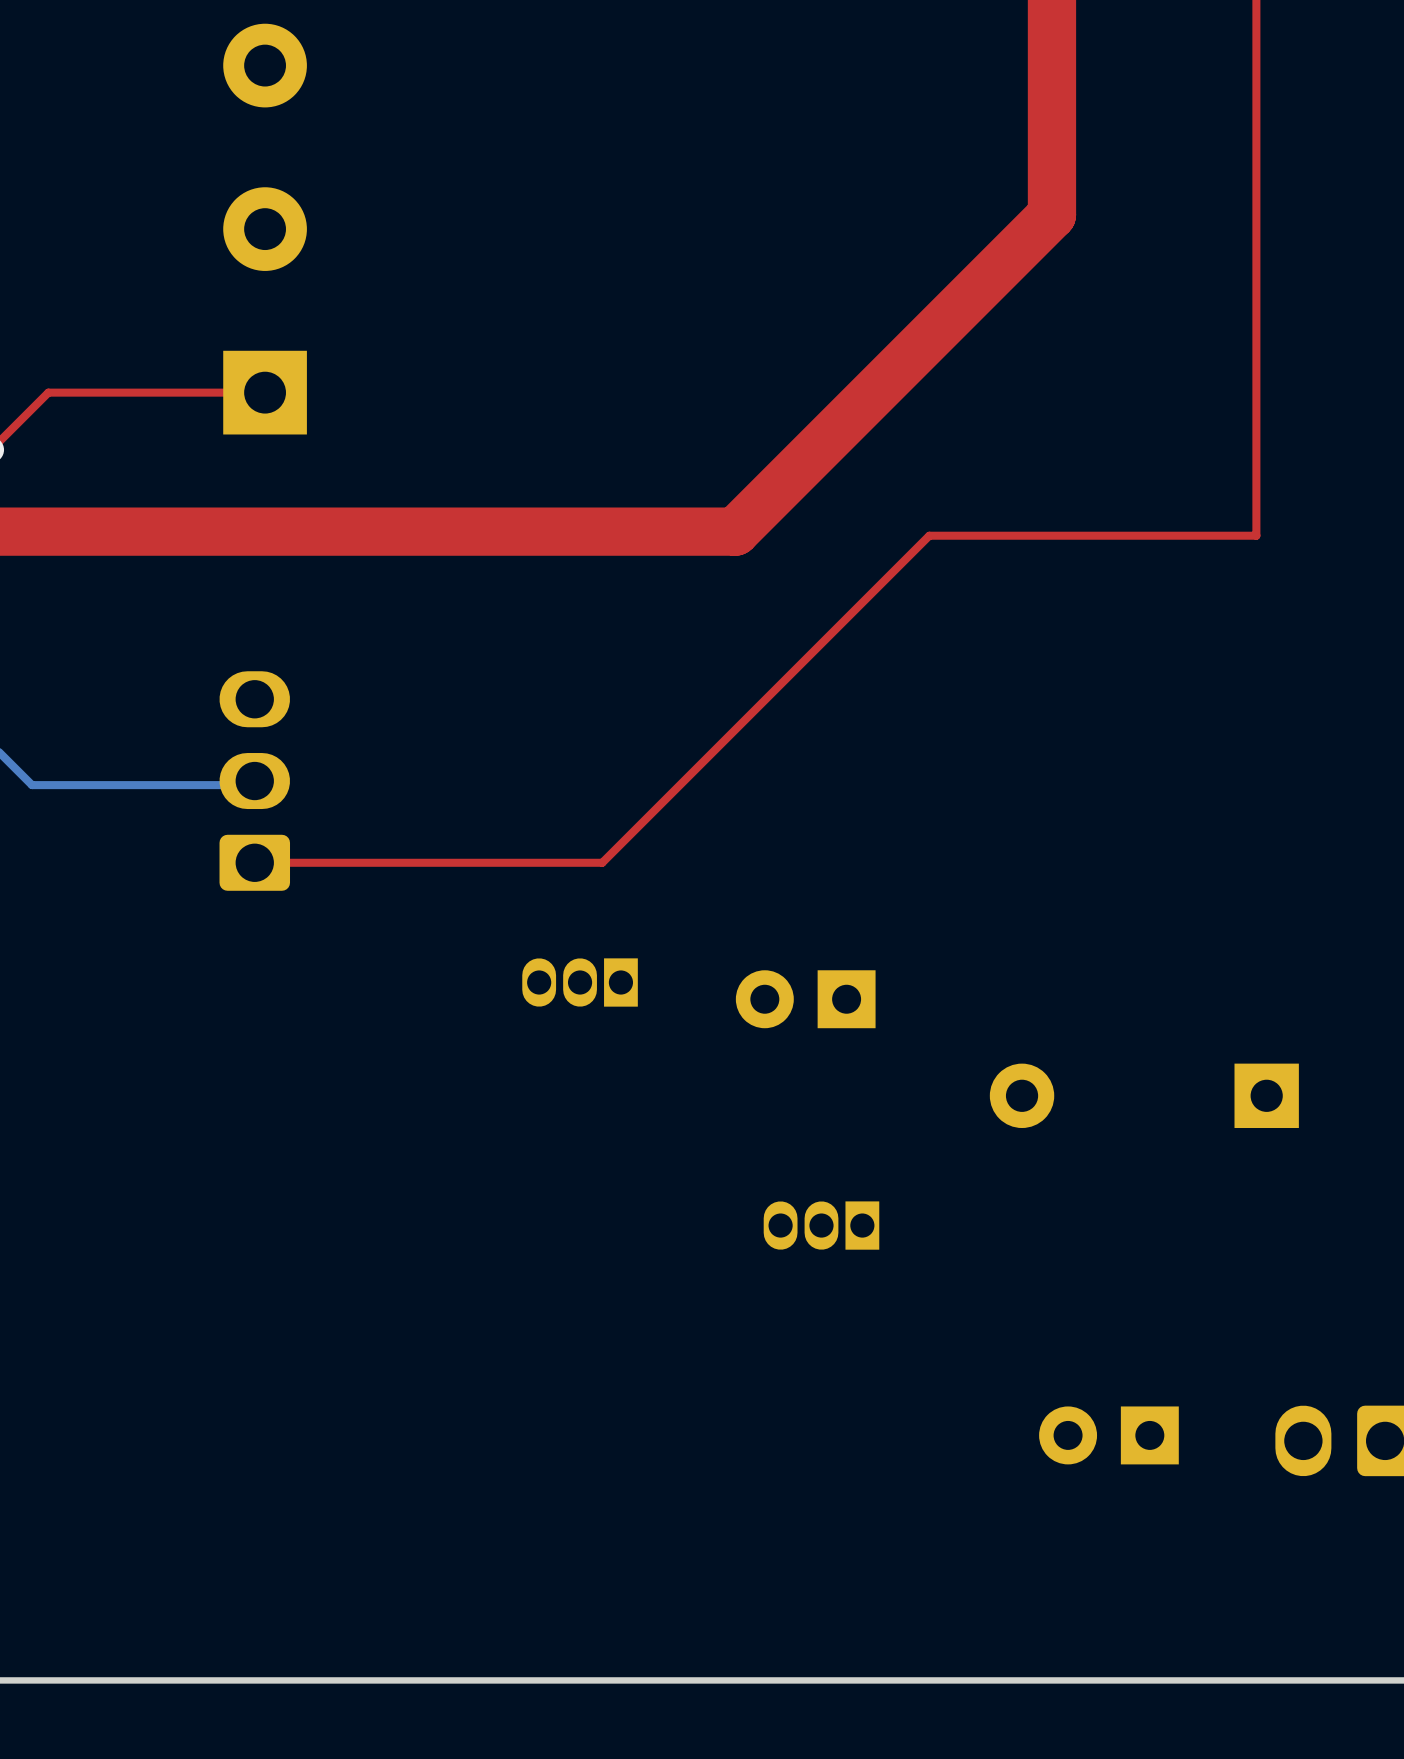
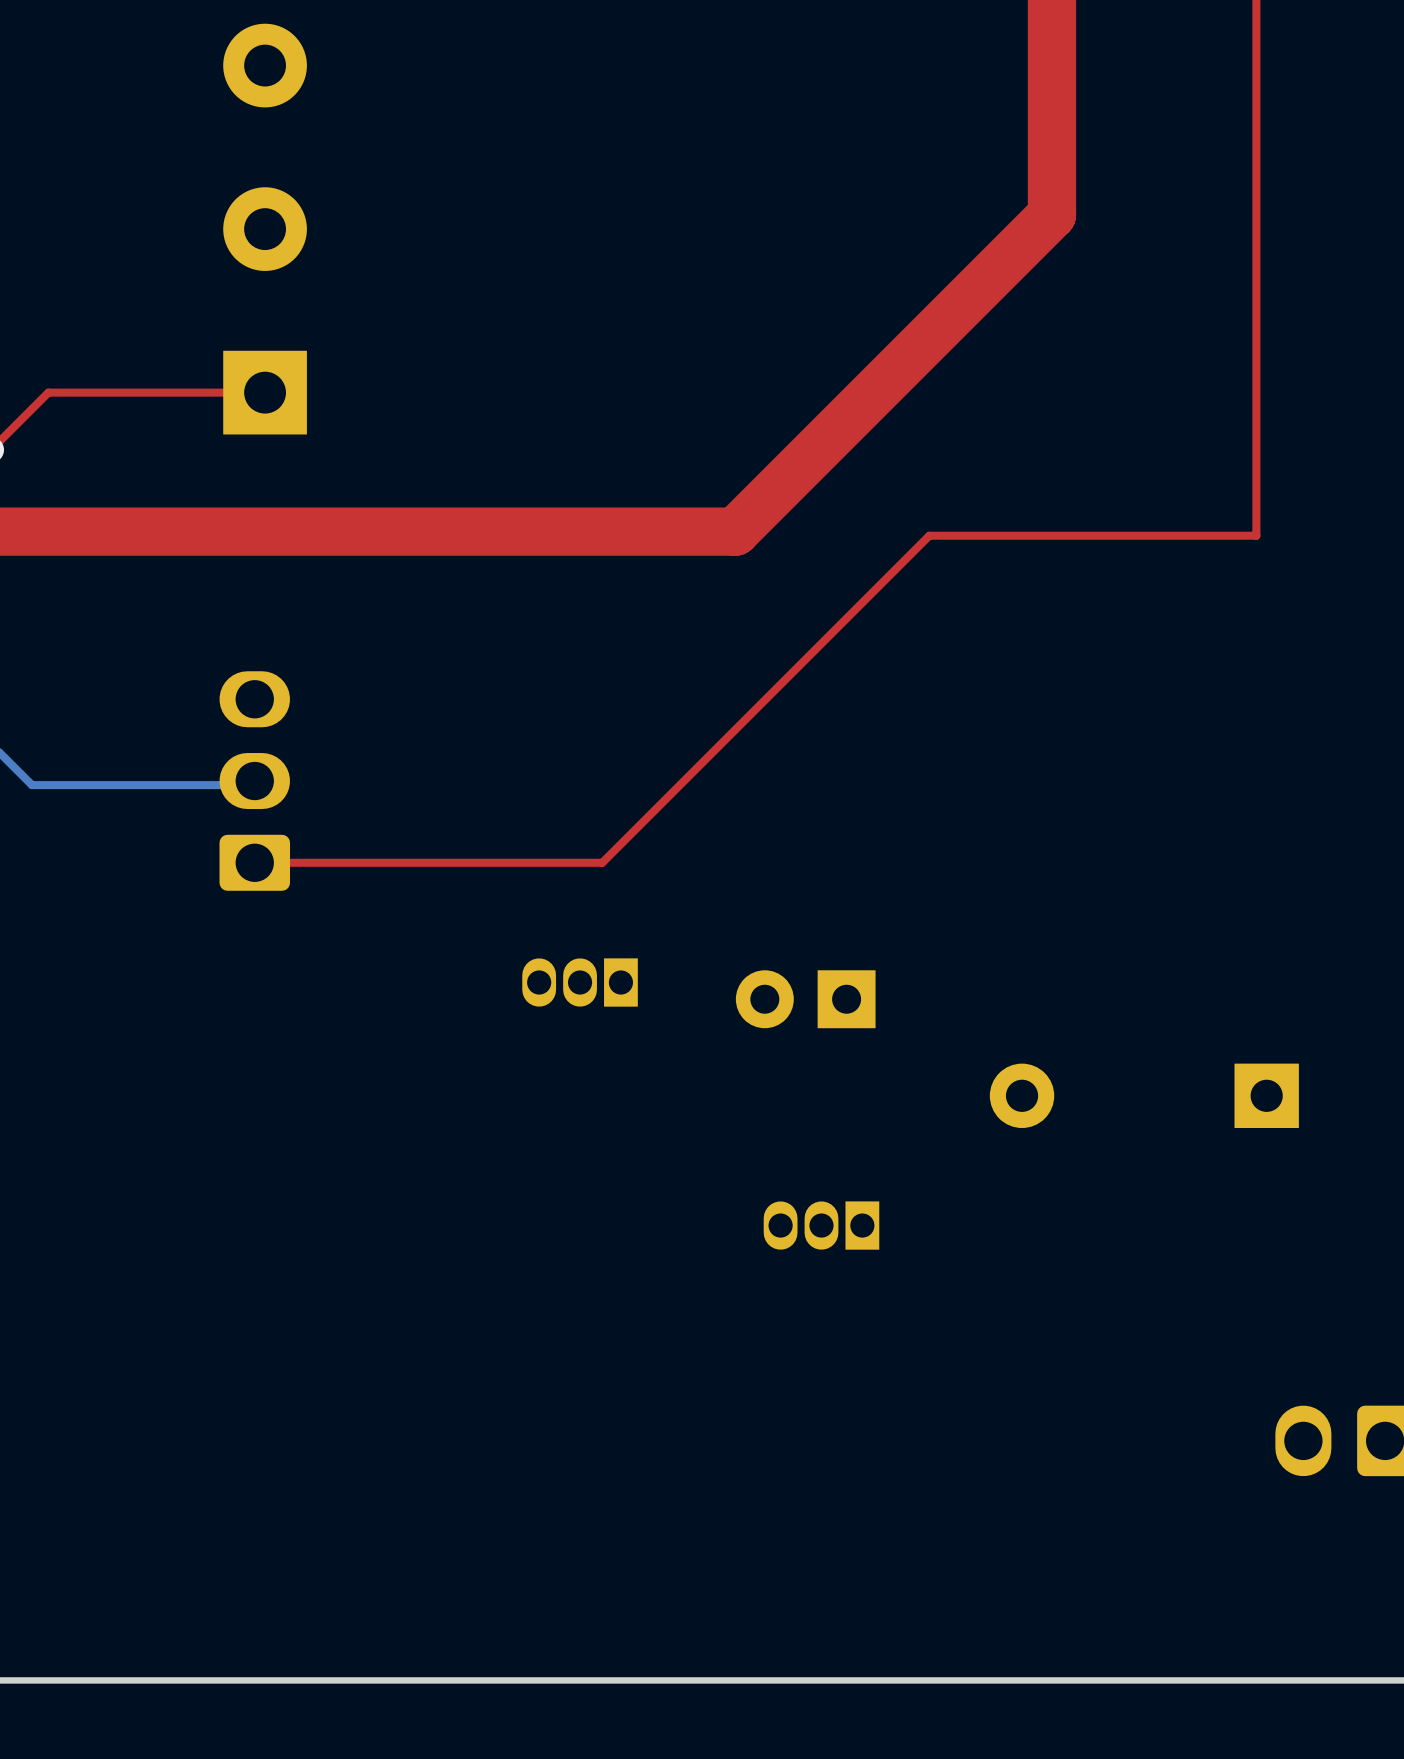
part: (1108, 1435) -> none

